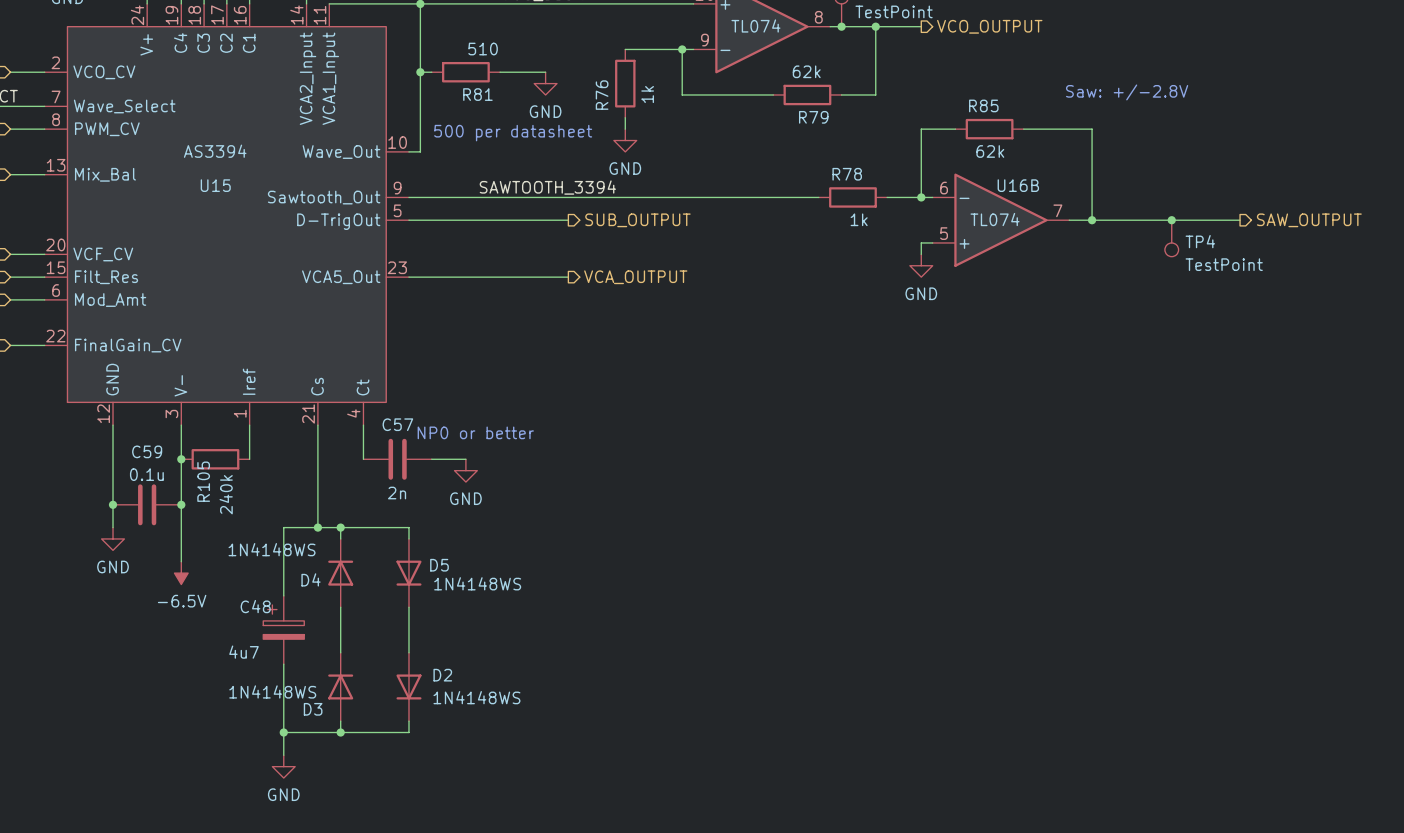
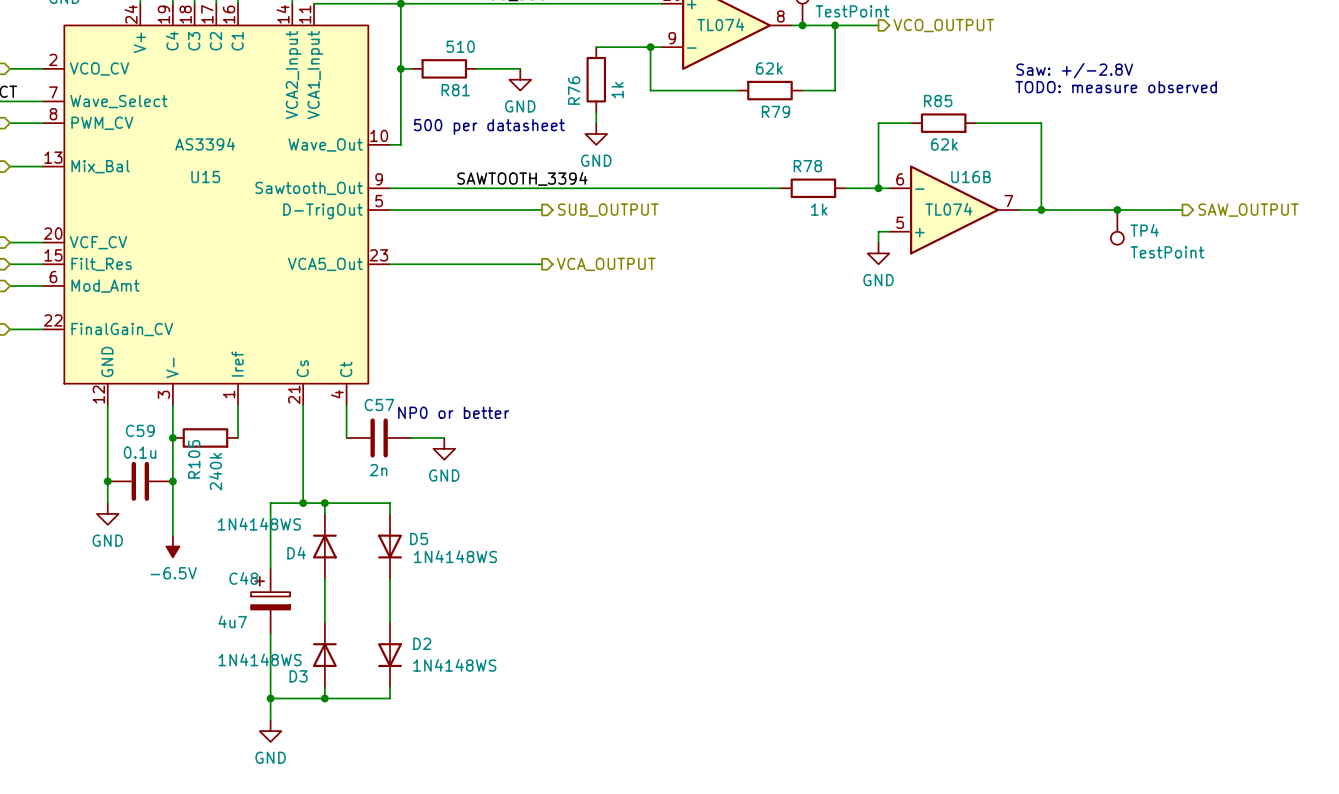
text: none -> Saw: +/-2.8V (1074, 70)
text: Saw: +/-2.8V (1127, 92) -> TODO: measure observed (1116, 87)

